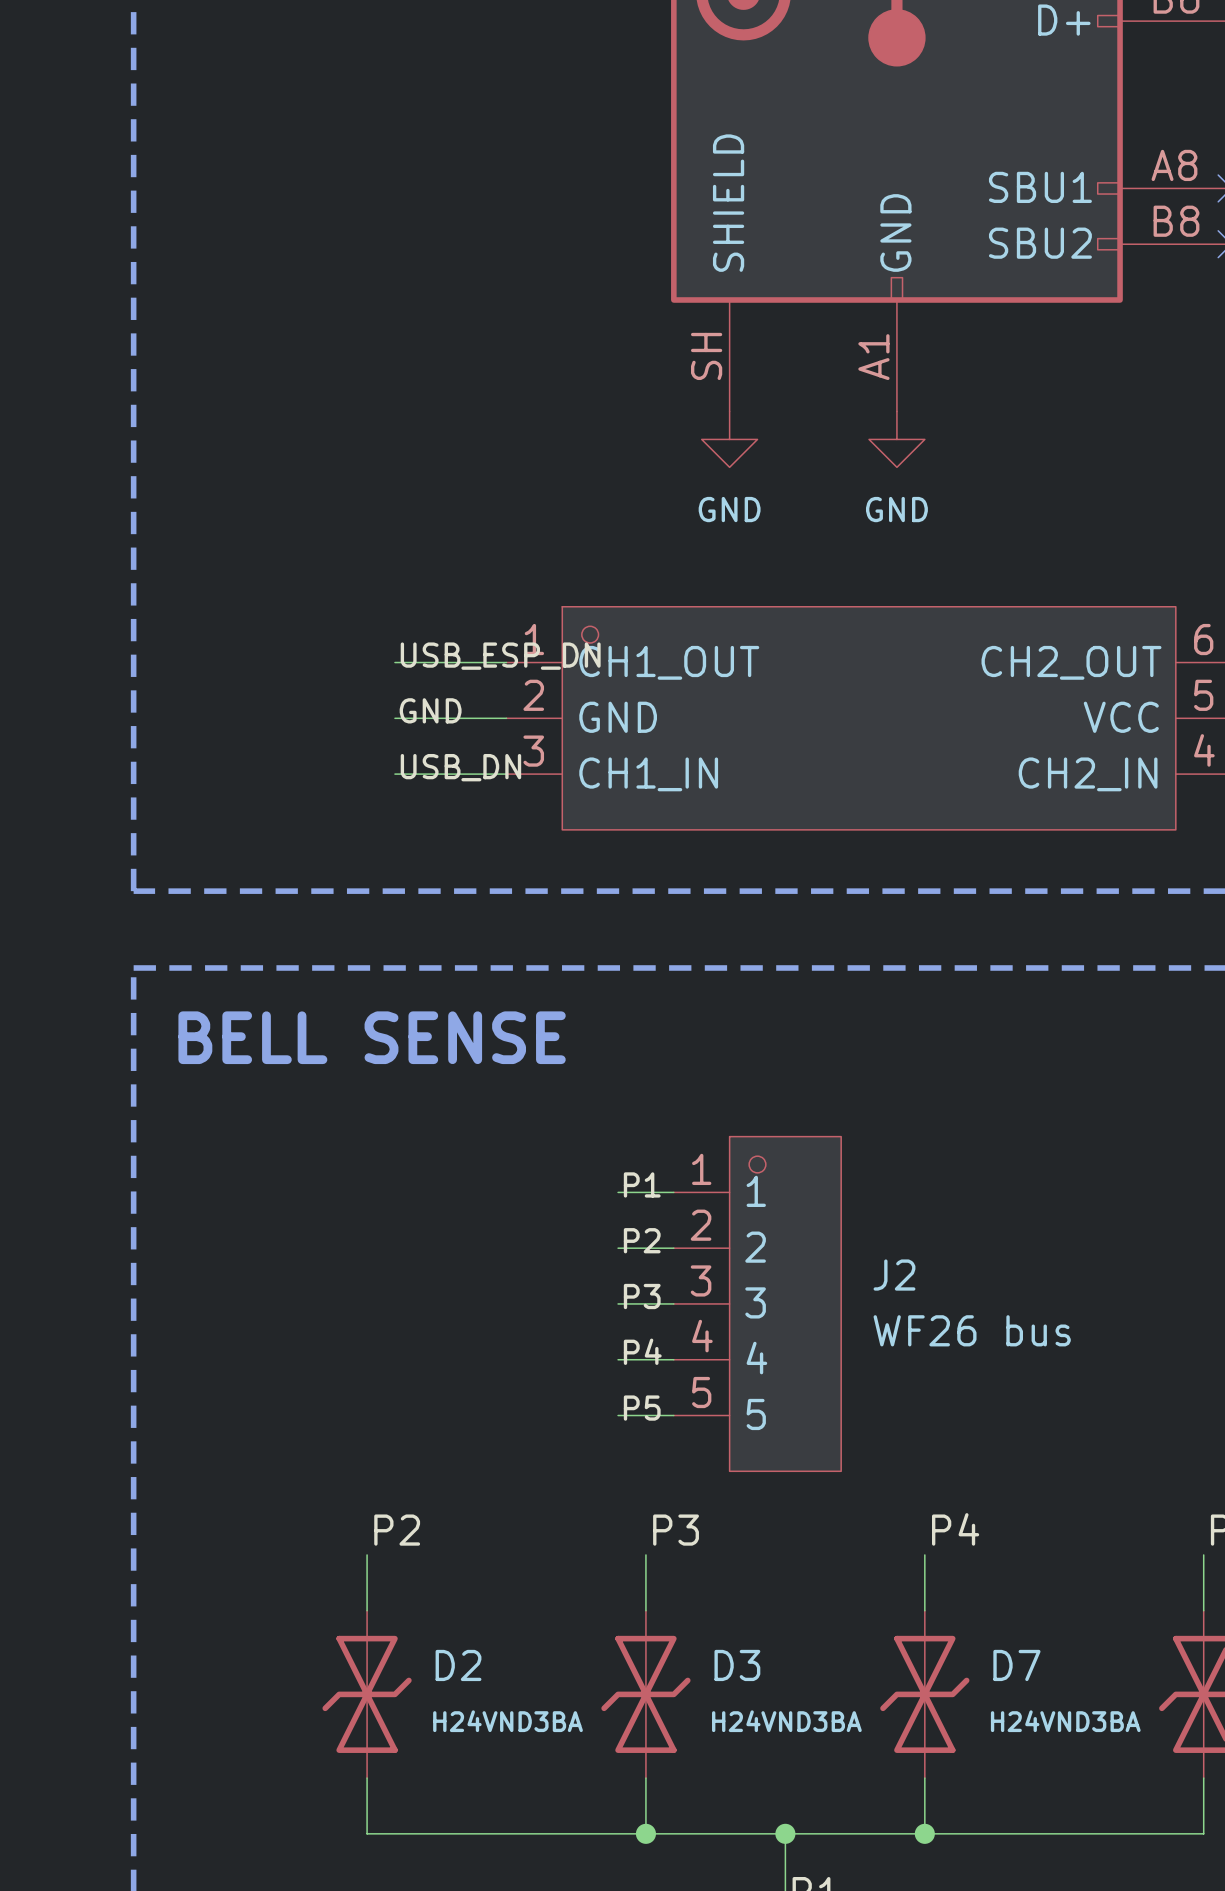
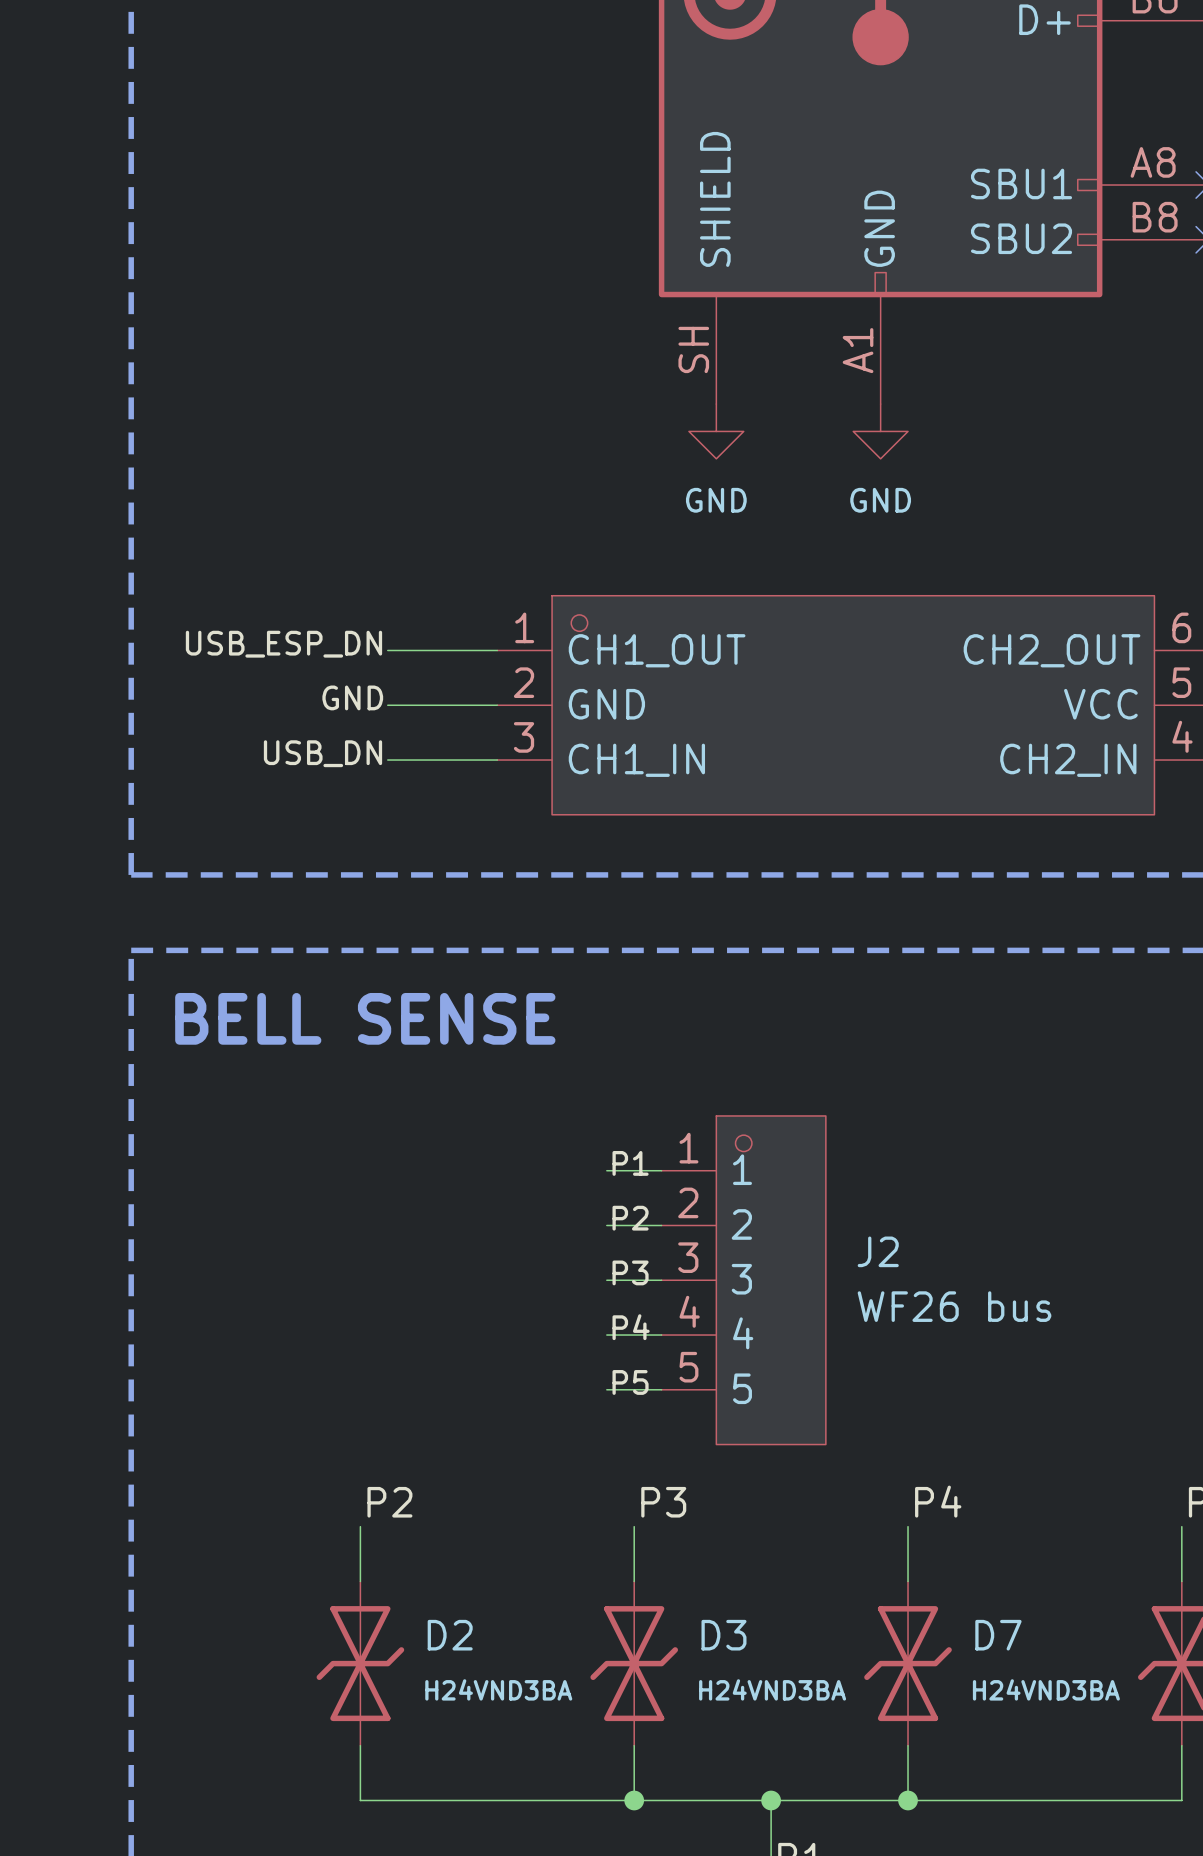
label position: USB_ESP_DN (500, 656) -> USB_ESP_DN (283, 644)
label position: GND (430, 710) -> GND (352, 697)
label position: USB_DN (460, 767) -> USB_DN (322, 753)

